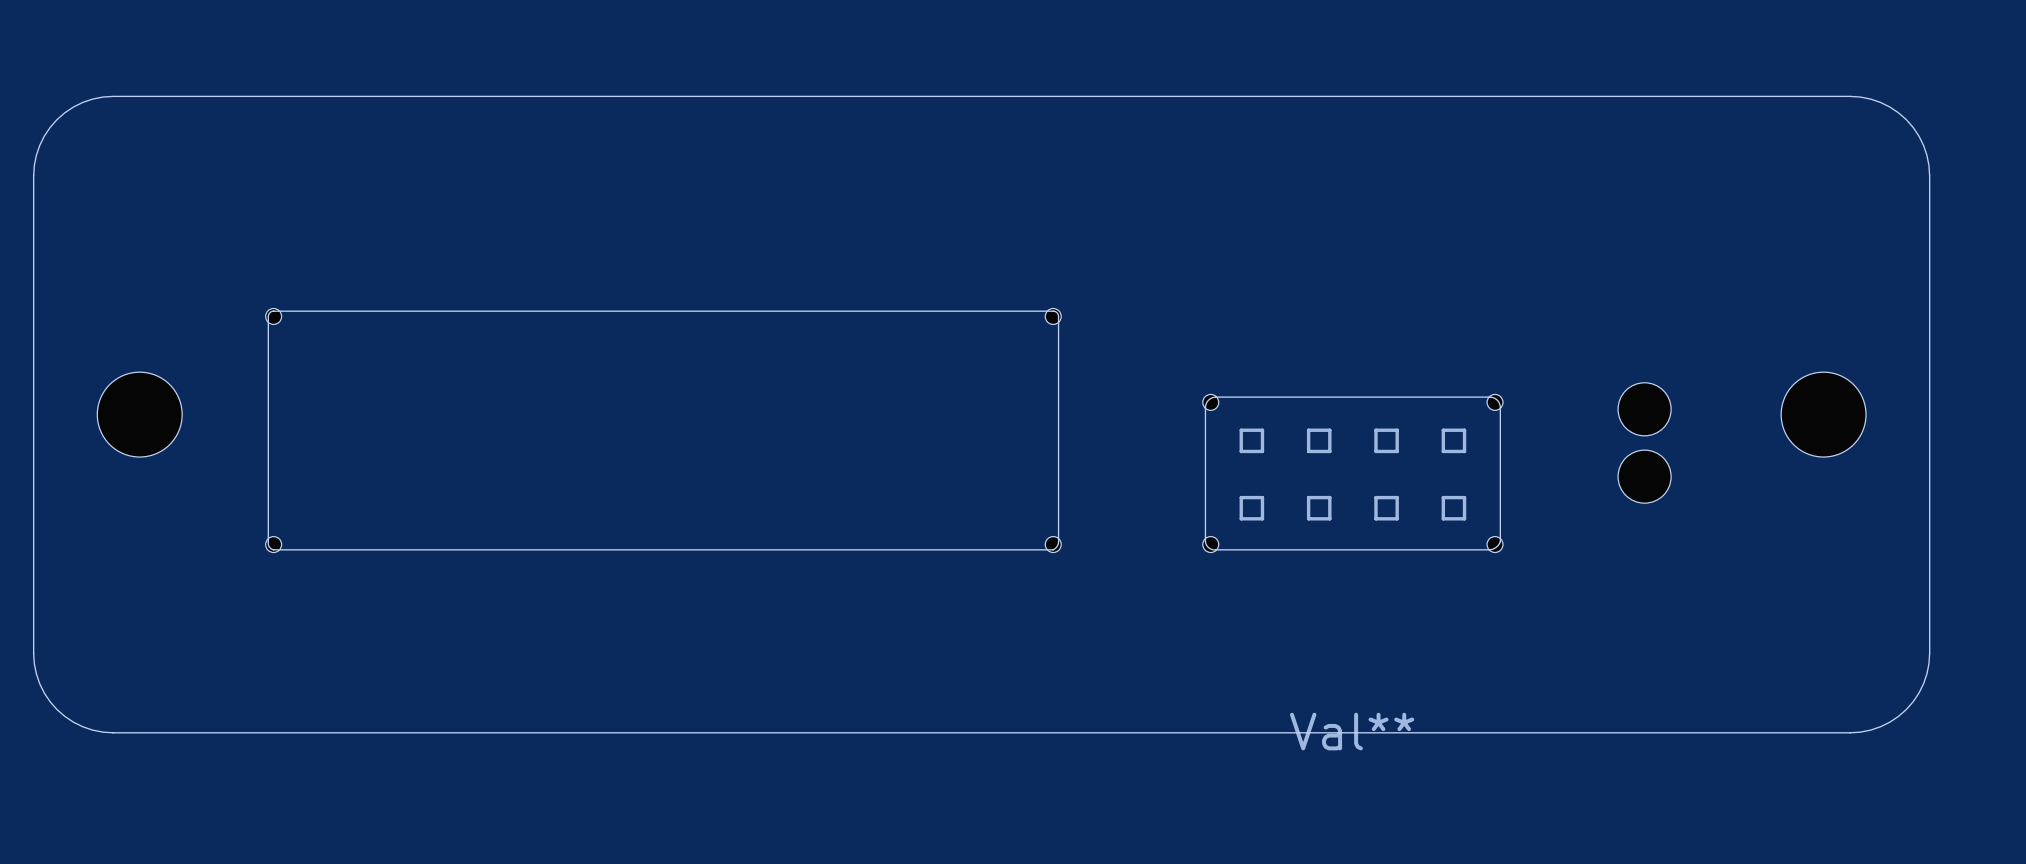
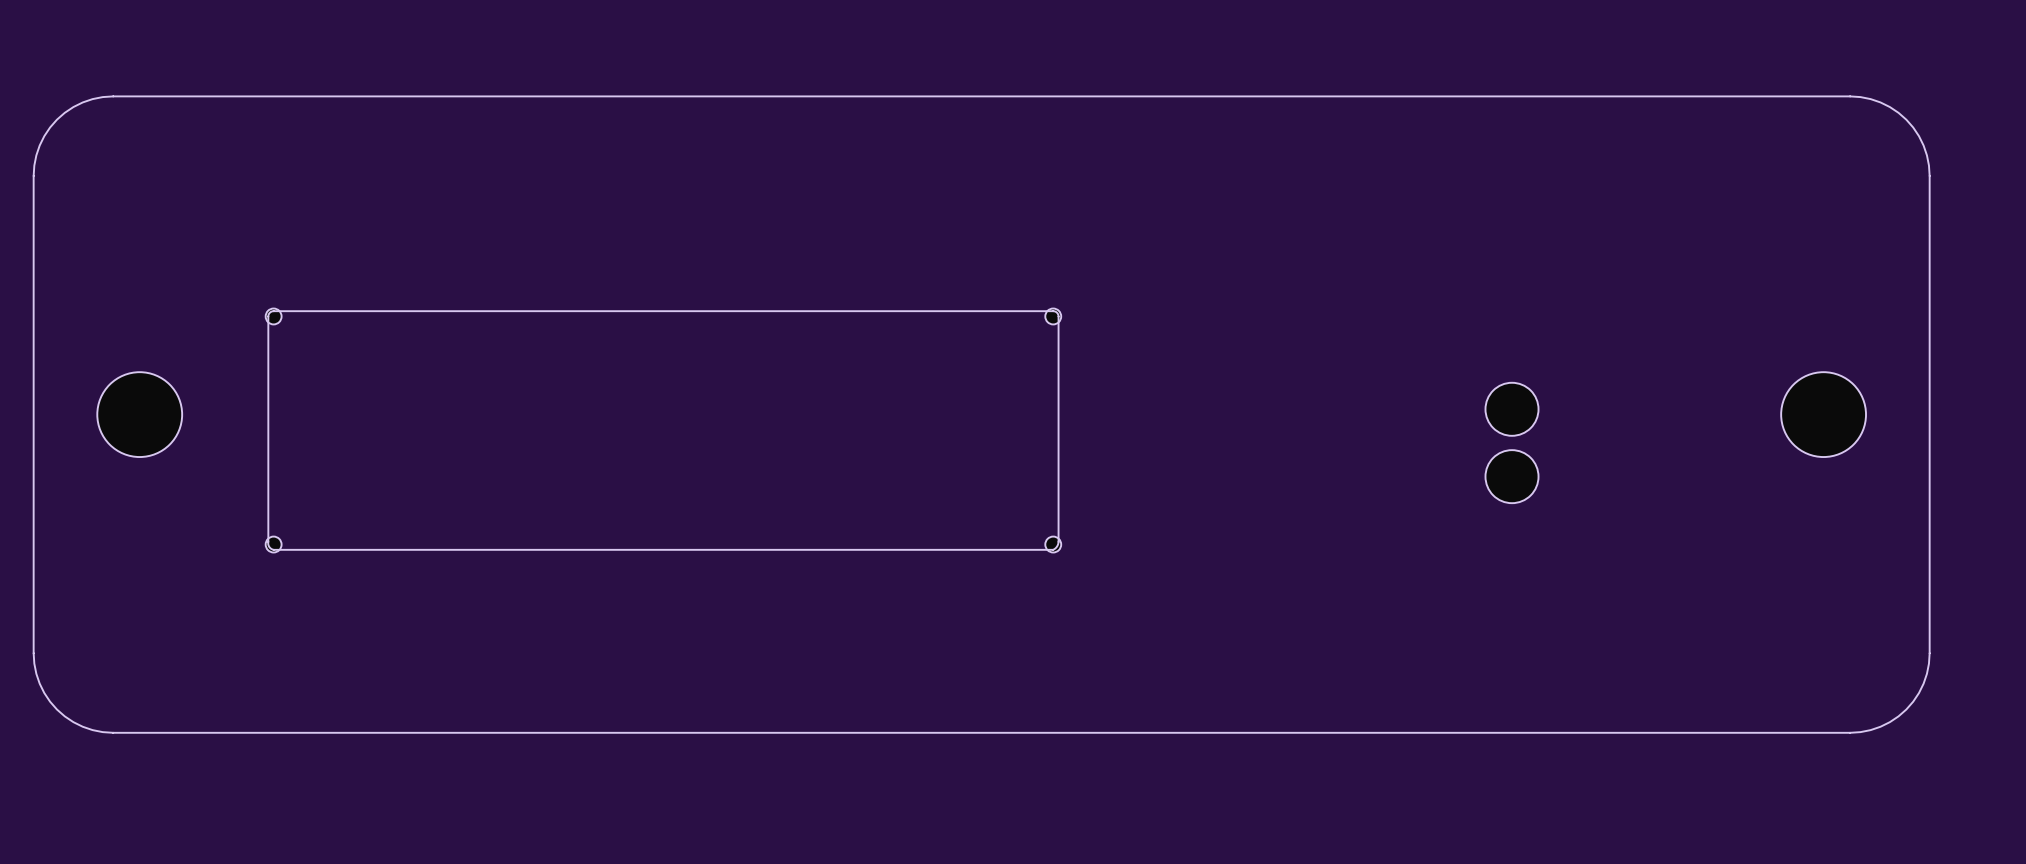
part: none -> (1512, 409)
part: (1644, 409) -> none
part: Val** (1352, 473) -> none
part: none -> (1512, 476)
part: (1644, 476) -> none

